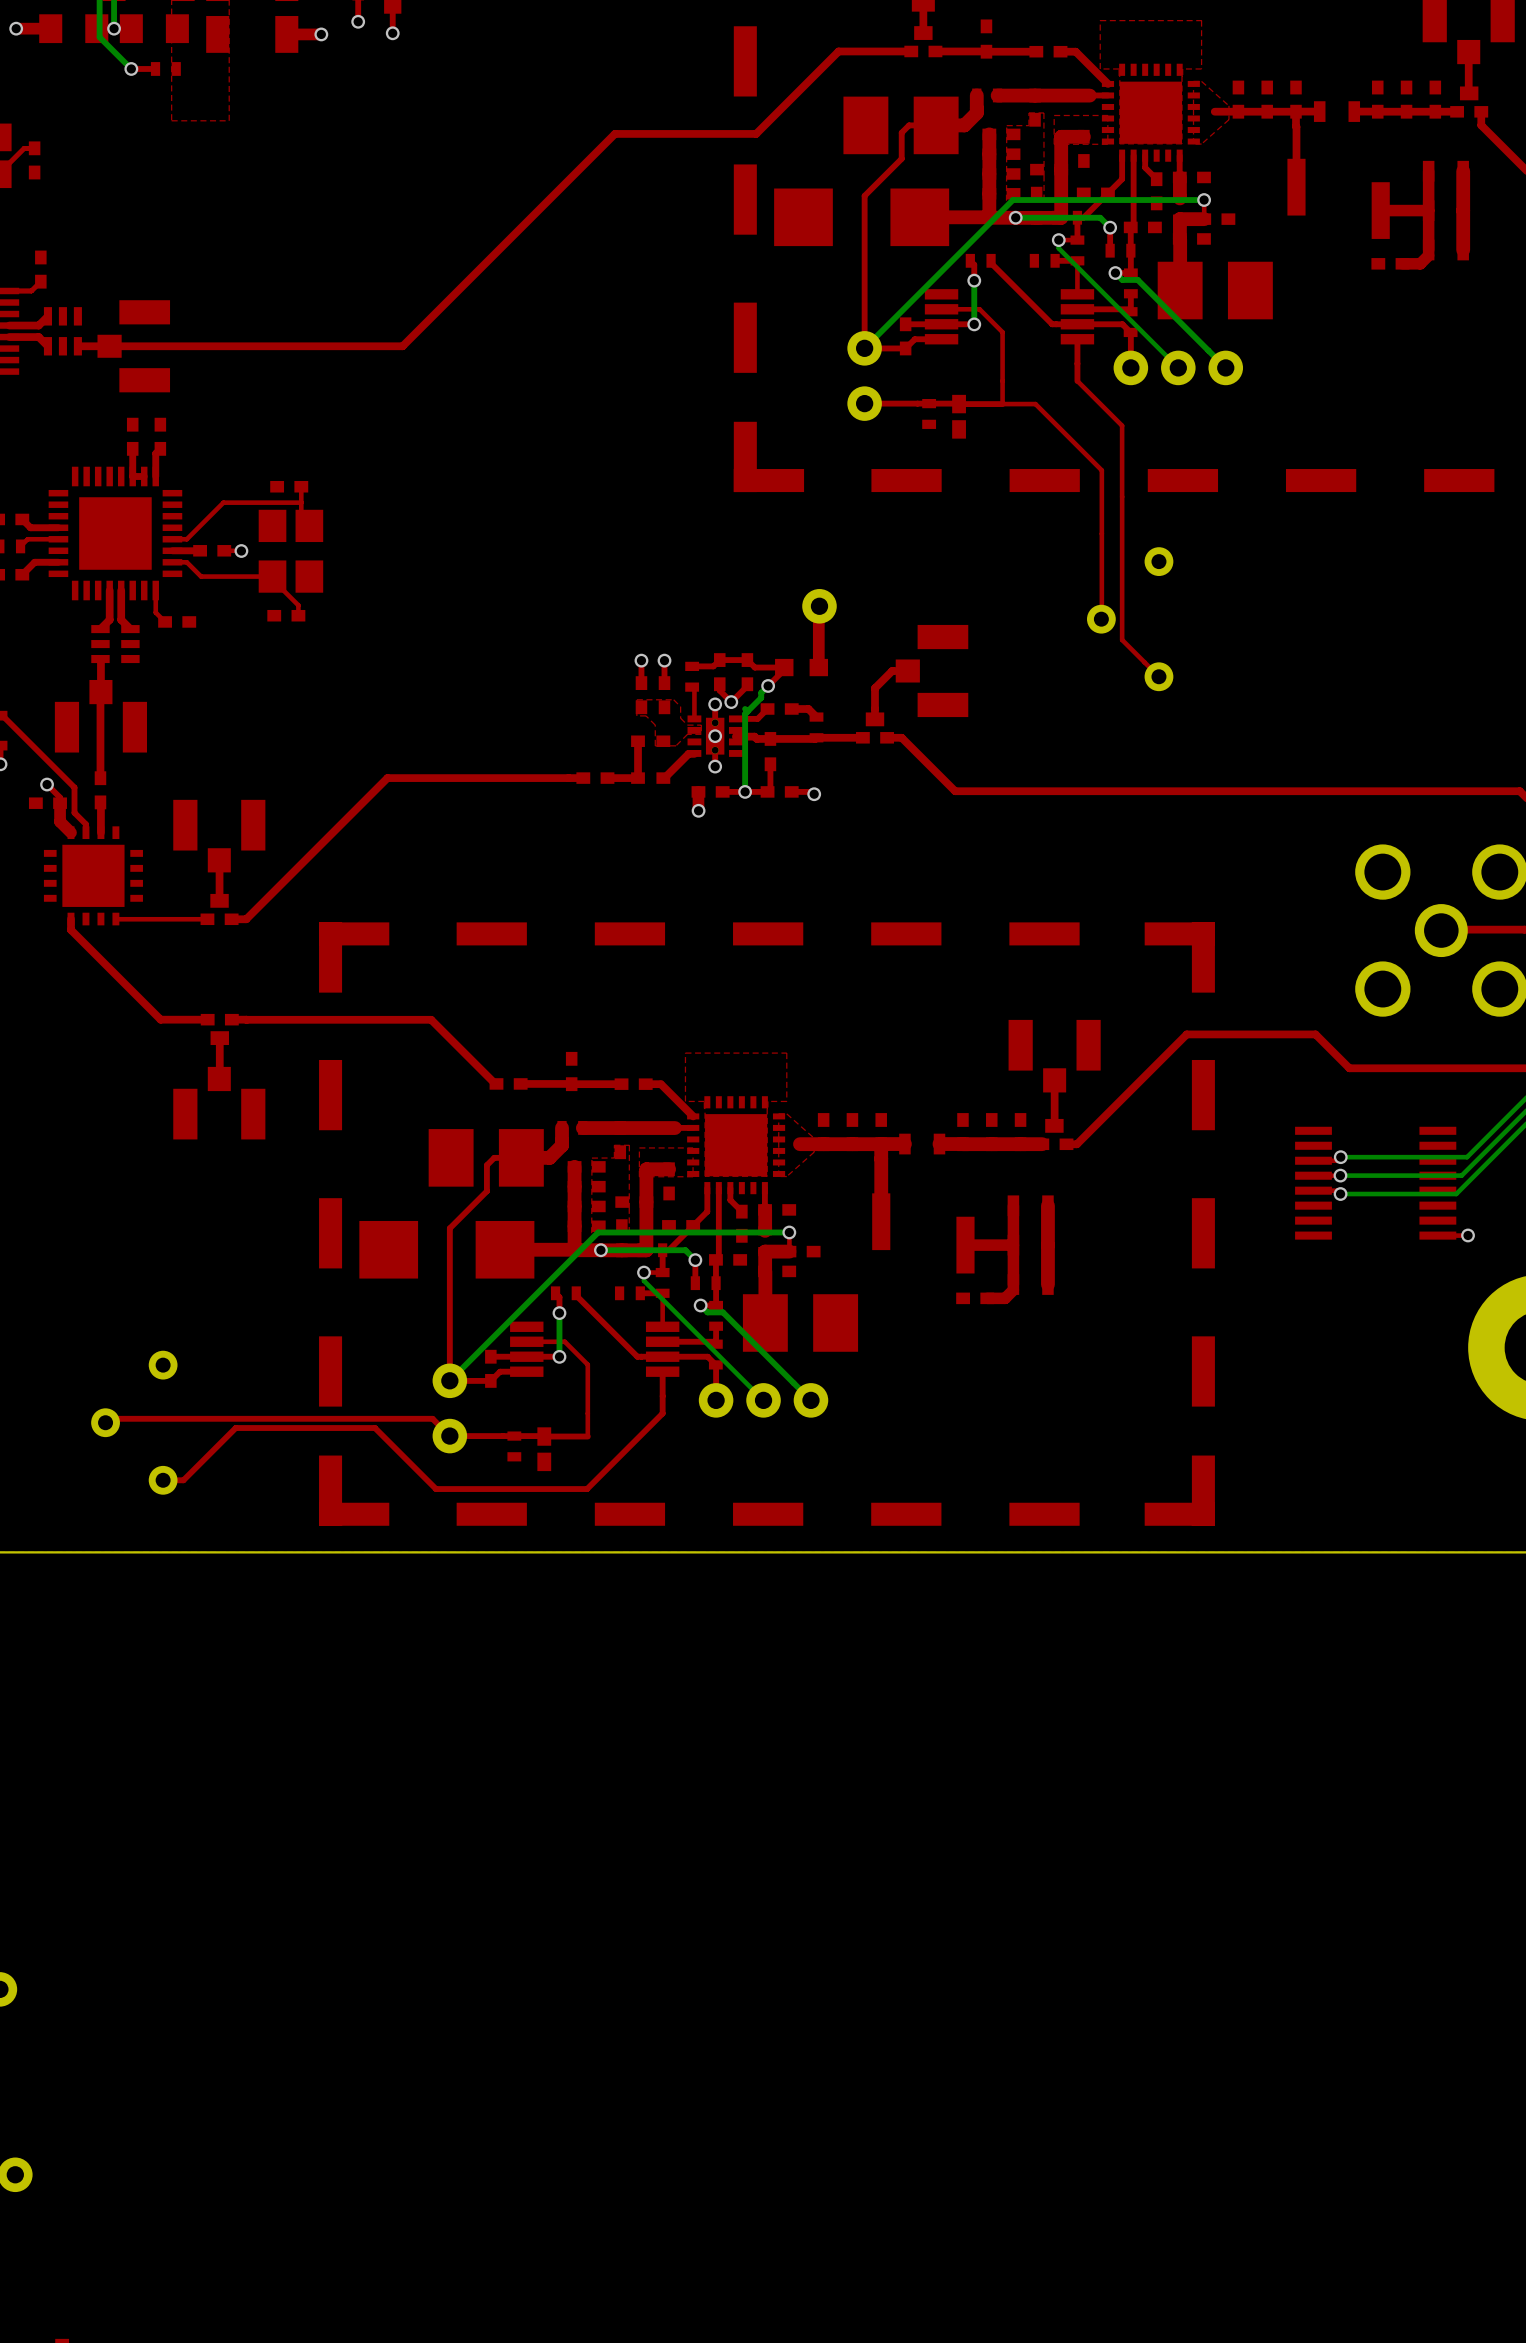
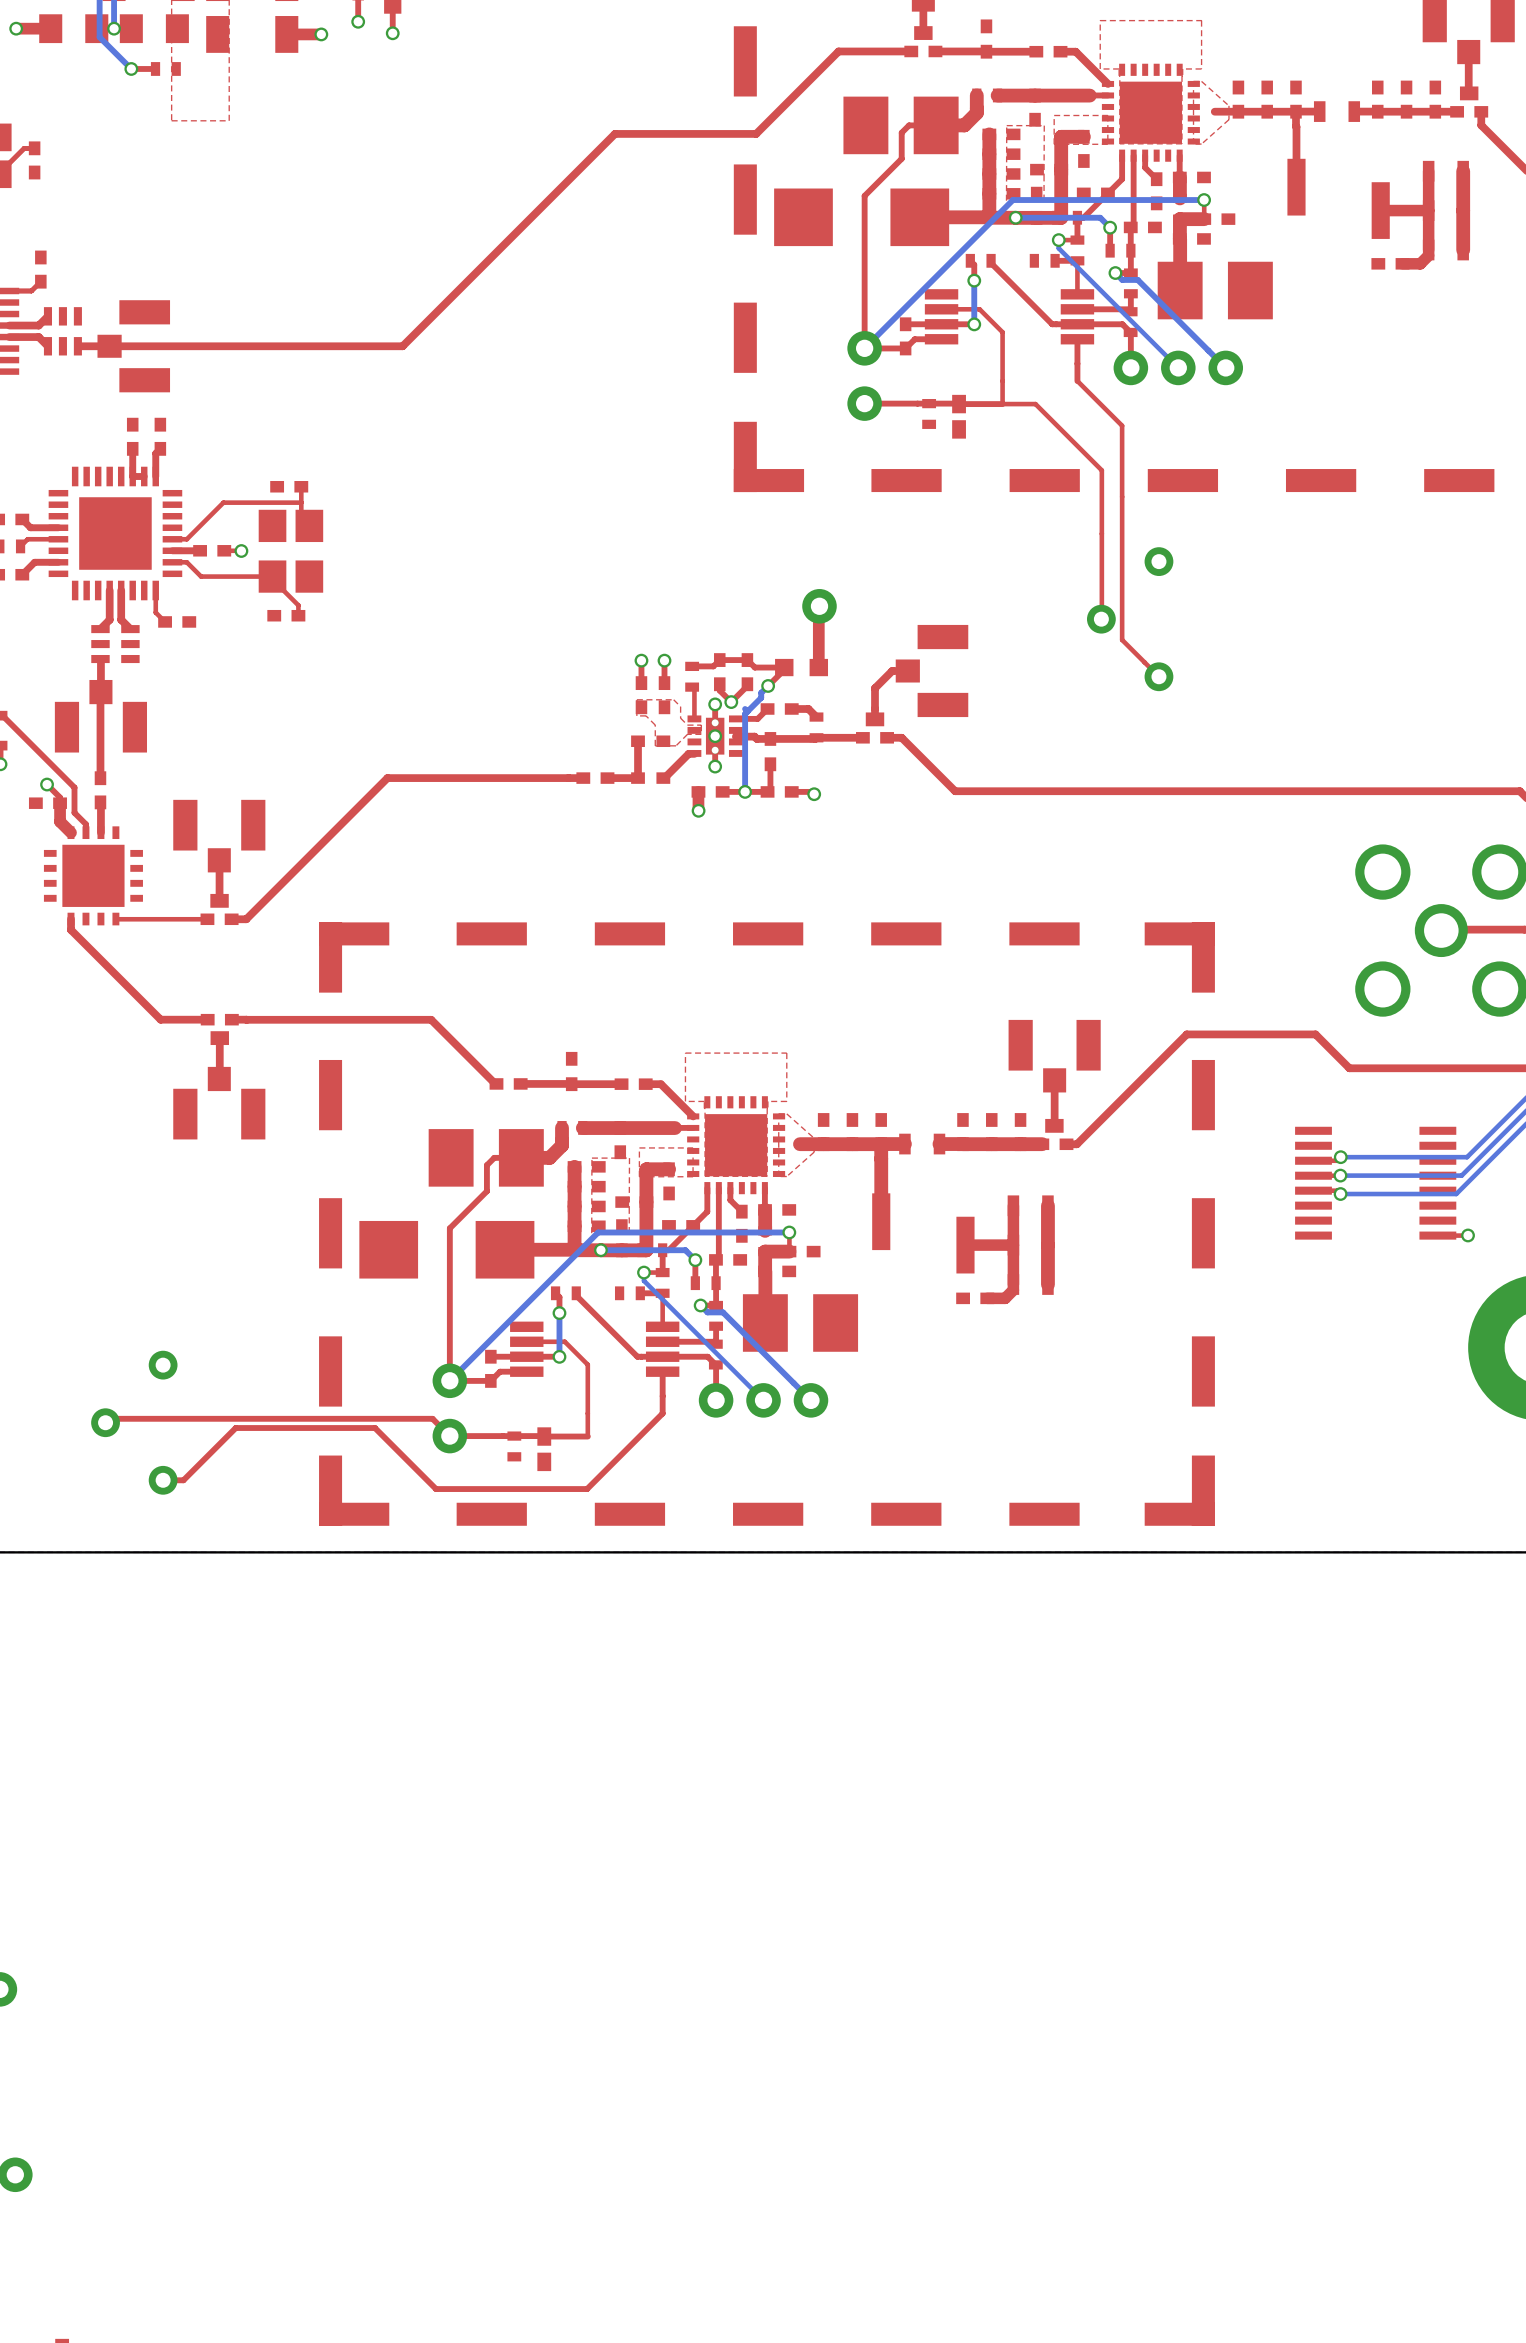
top zone outline: (1028, 125) (1028, 112) (1043, 112) (1044, 175) -> (1028, 125) (1044, 125) (1044, 175)
top zone outline: (591, 1158) (614, 1157) (614, 1145) (629, 1145) (629, 1207) -> (591, 1158) (629, 1158) (629, 1207)

